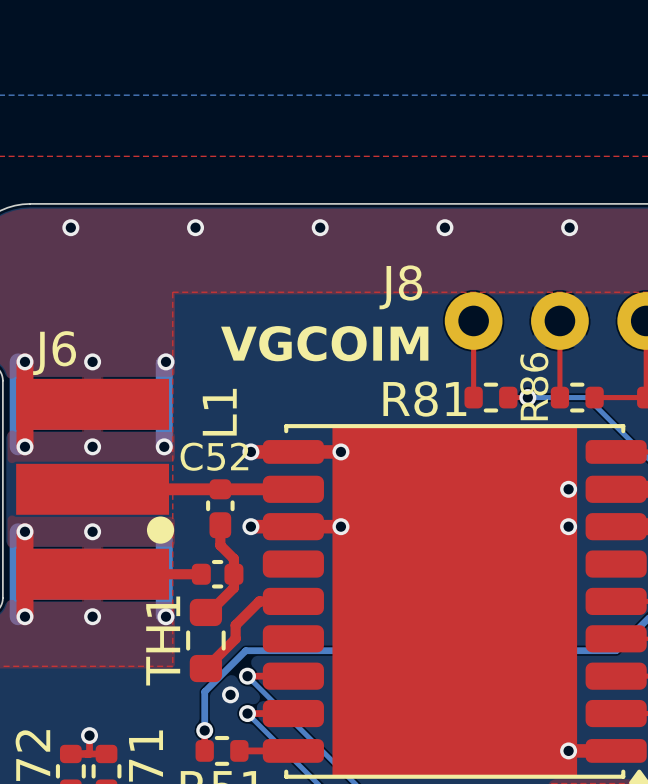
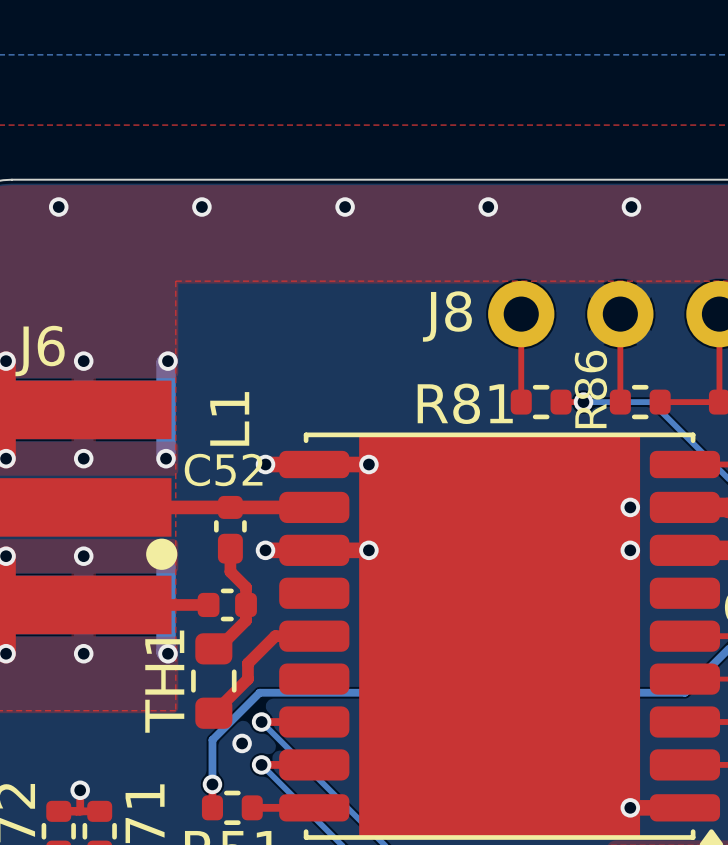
J8 name position: J8 (400, 287) -> J8 (447, 316)
text: VGCOIM (324, 343) -> none

